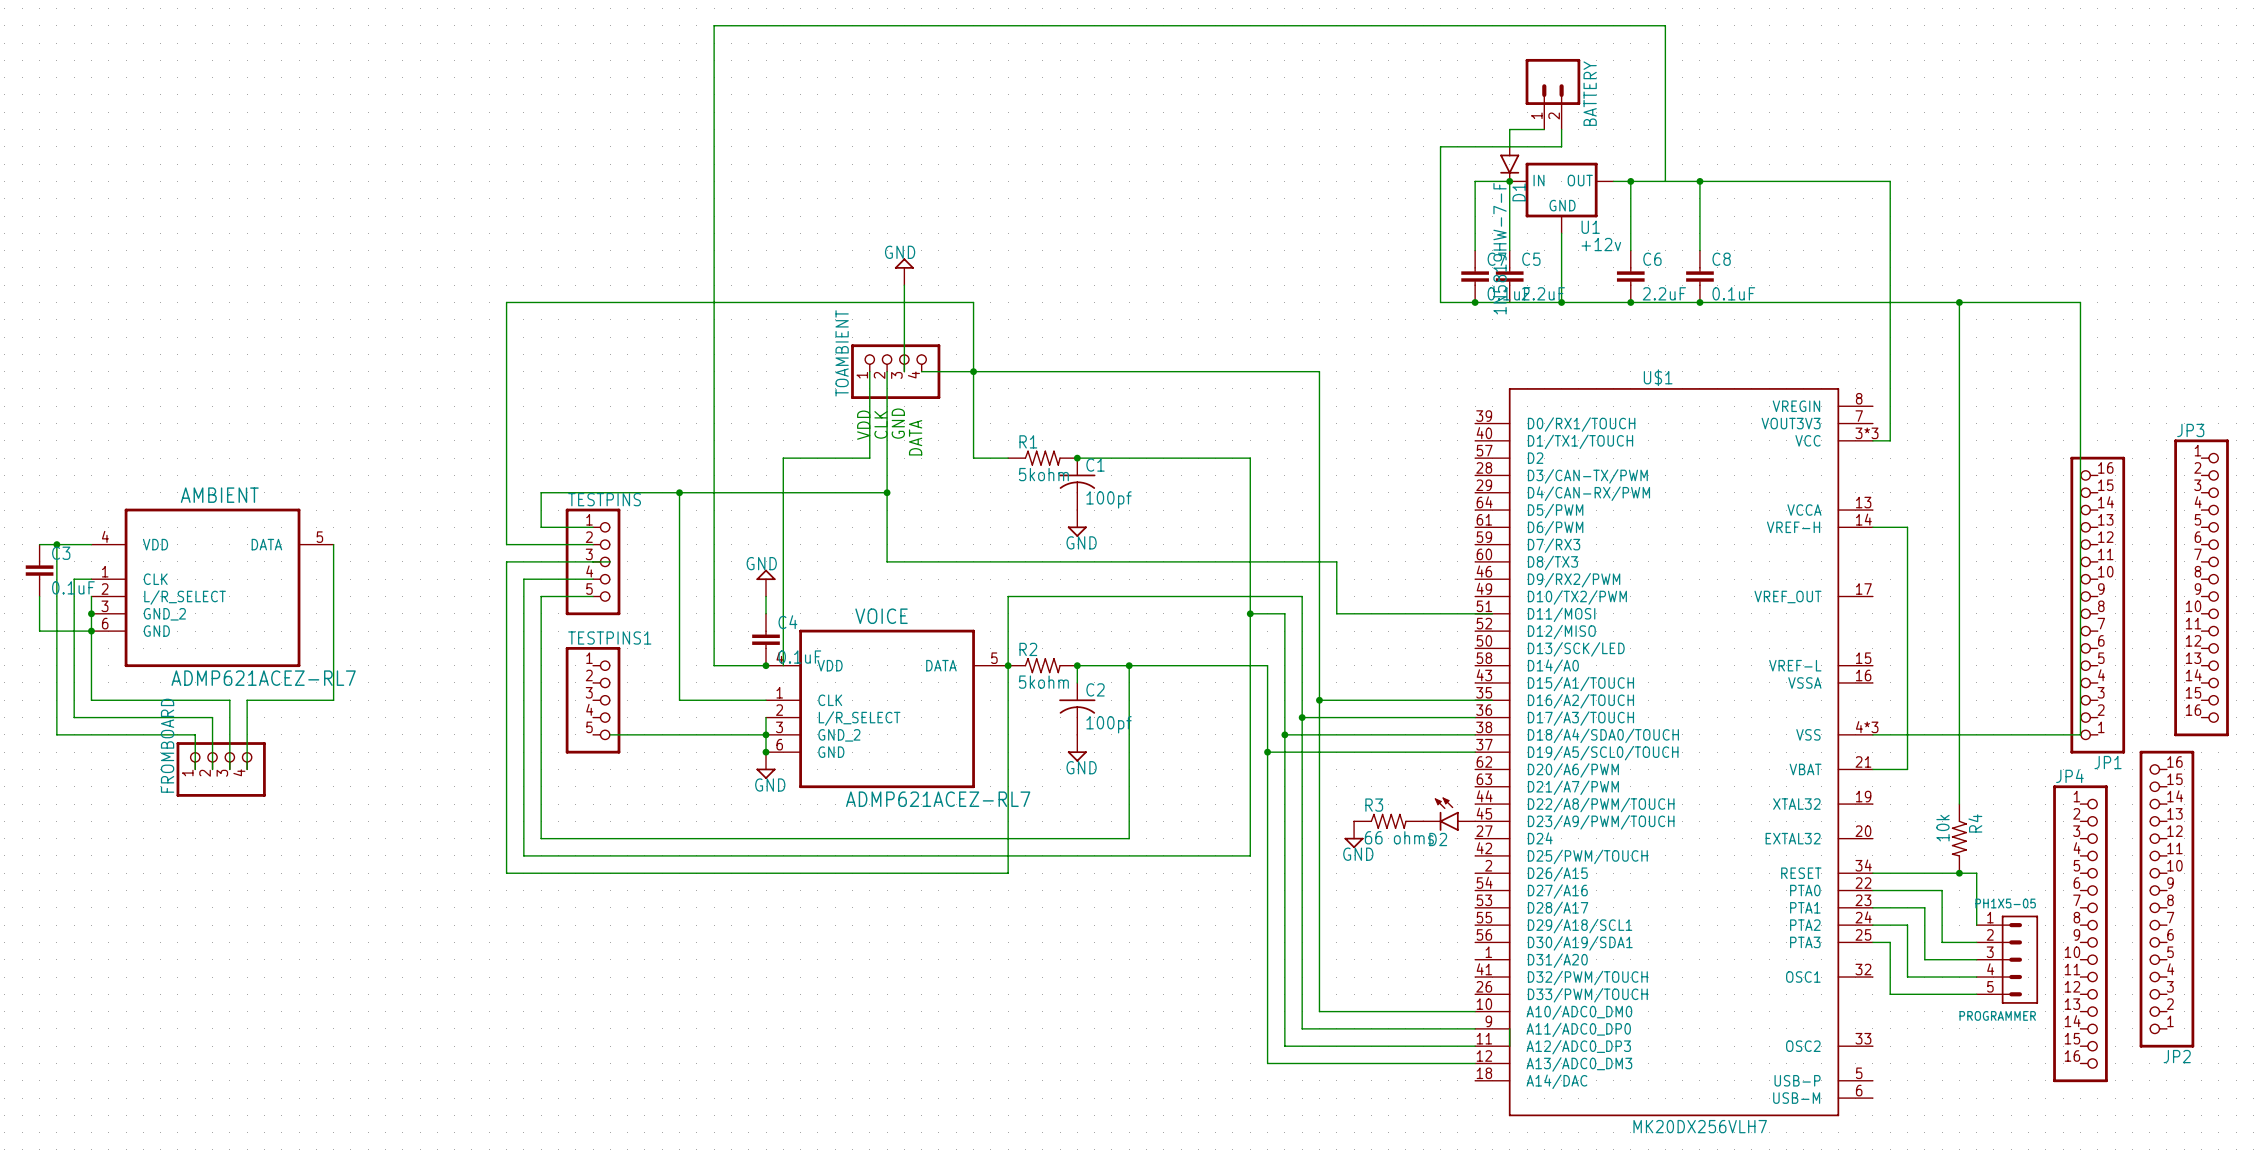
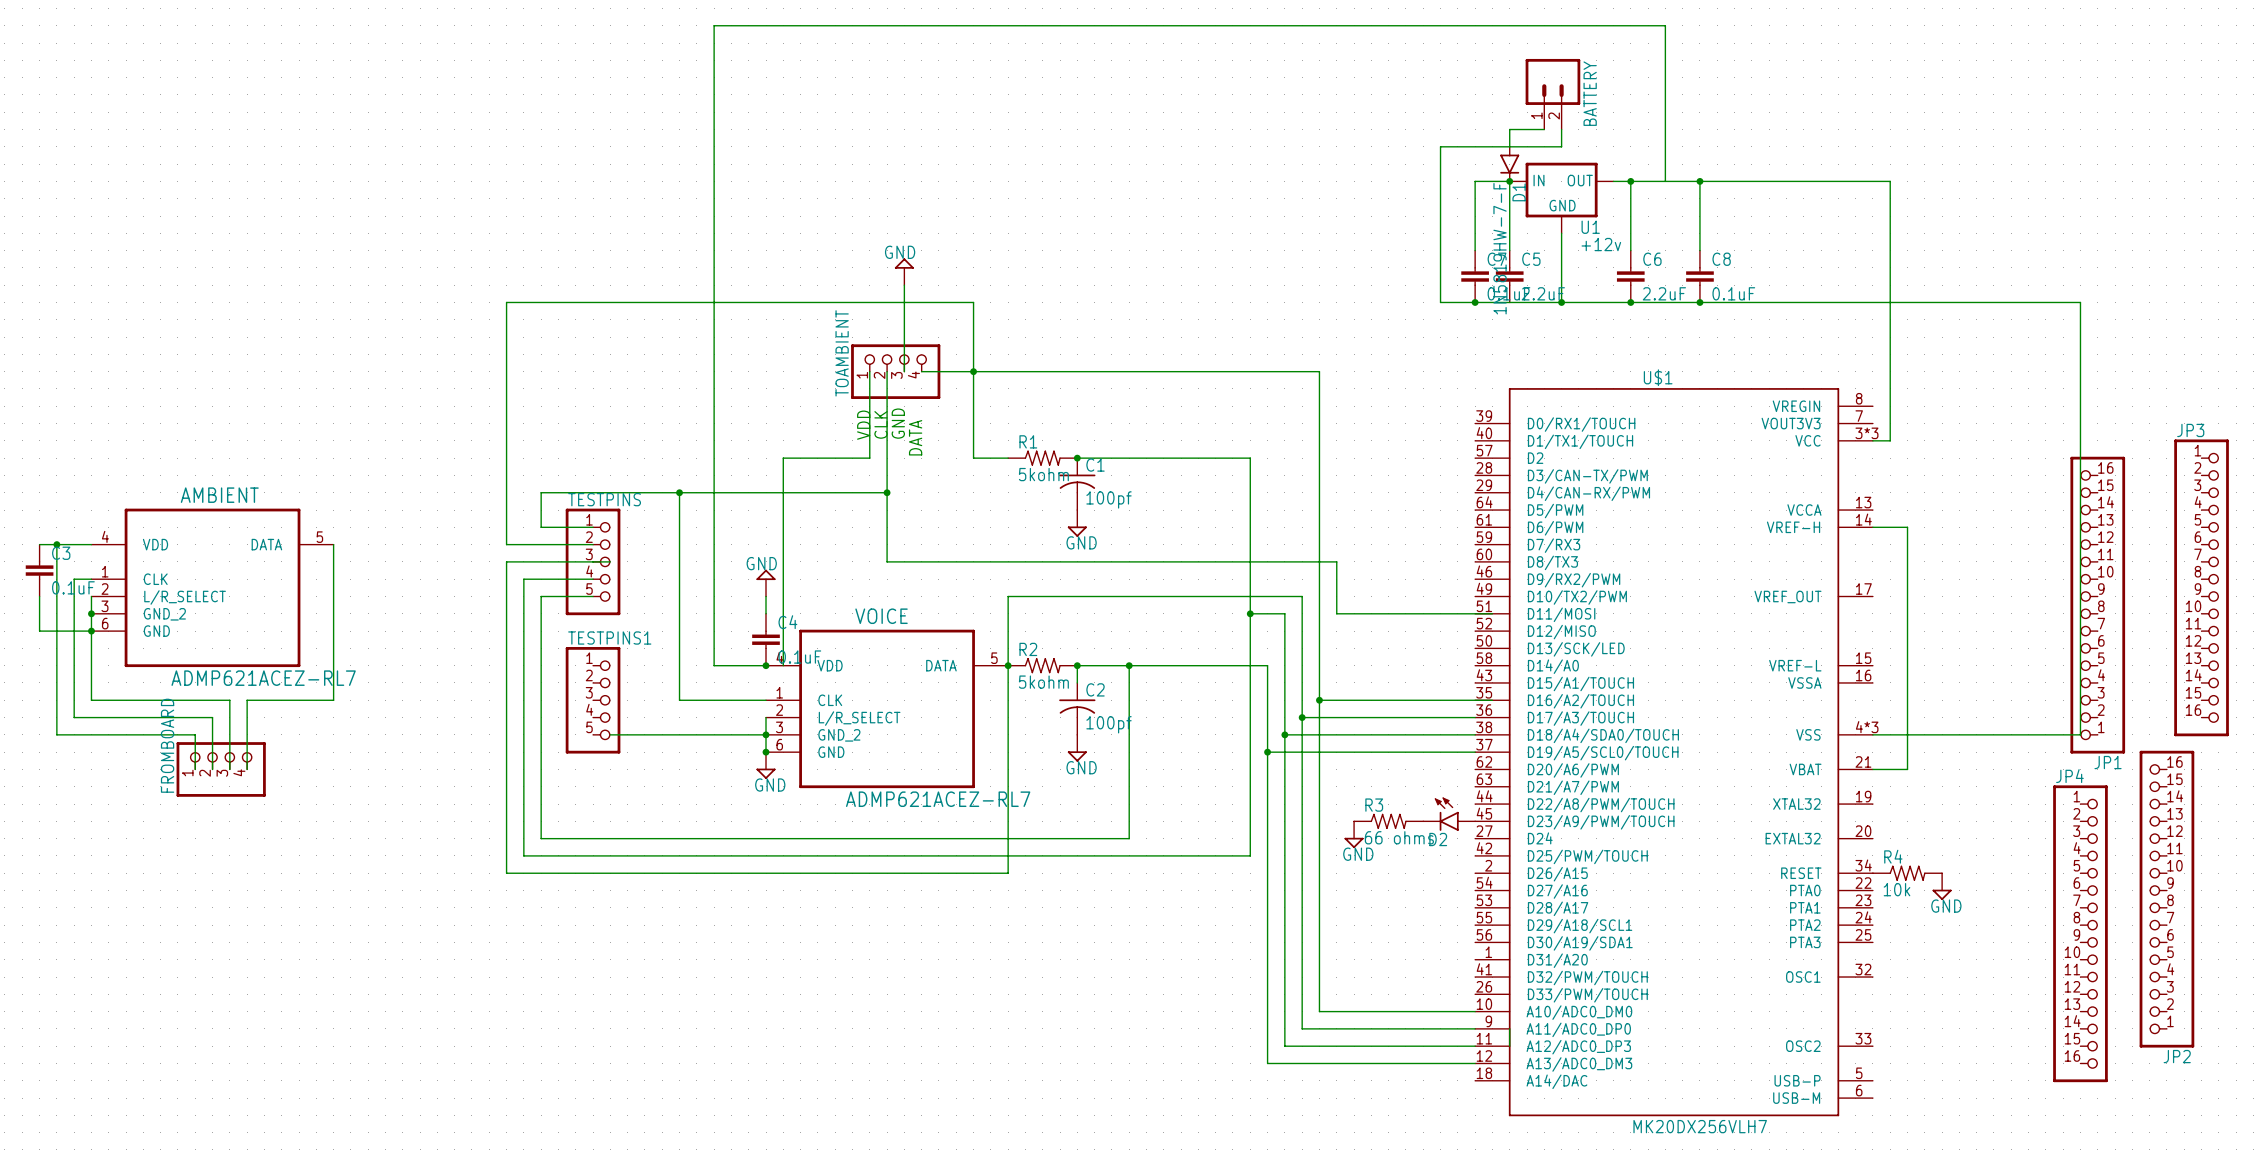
wire: (1959, 302) (1959, 804) -> none
junction: (1959, 302) -> none
R4 rotation: 0° (1959, 838) -> 90° counterclockwise (1907, 873)
R4 position: (1959, 838) -> (1907, 873)
wire: (1872, 873) (1976, 873) (1976, 925) -> none
junction: (1959, 873) -> none
power symbol: none -> GND (1942, 886)
wire: (1872, 890) (1942, 890) (1942, 942) (1976, 942) -> none
wire: (1872, 907) (1924, 907) (1924, 959) (1976, 959) -> none
wire: (1872, 925) (1907, 925) (1907, 977) (1976, 977) -> none
wire: (1872, 942) (1890, 942) (1890, 994) (1976, 994) -> none
PROGRAMMER: PH1X5-05 (2007, 959) -> none

